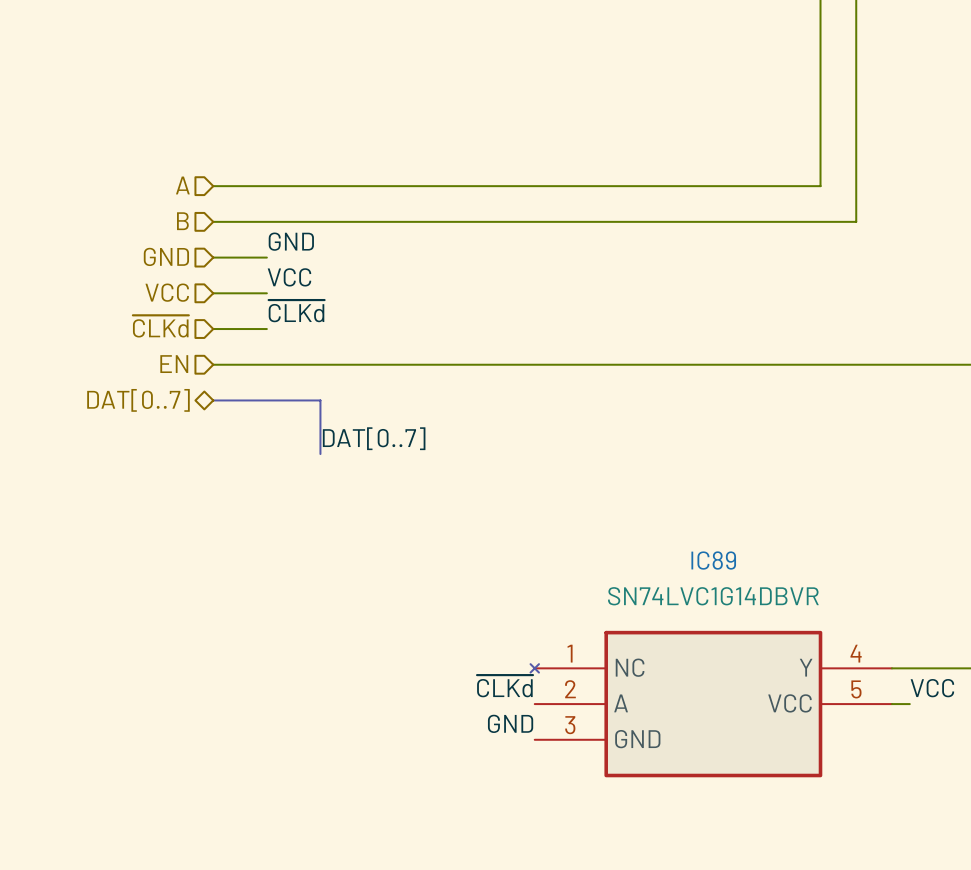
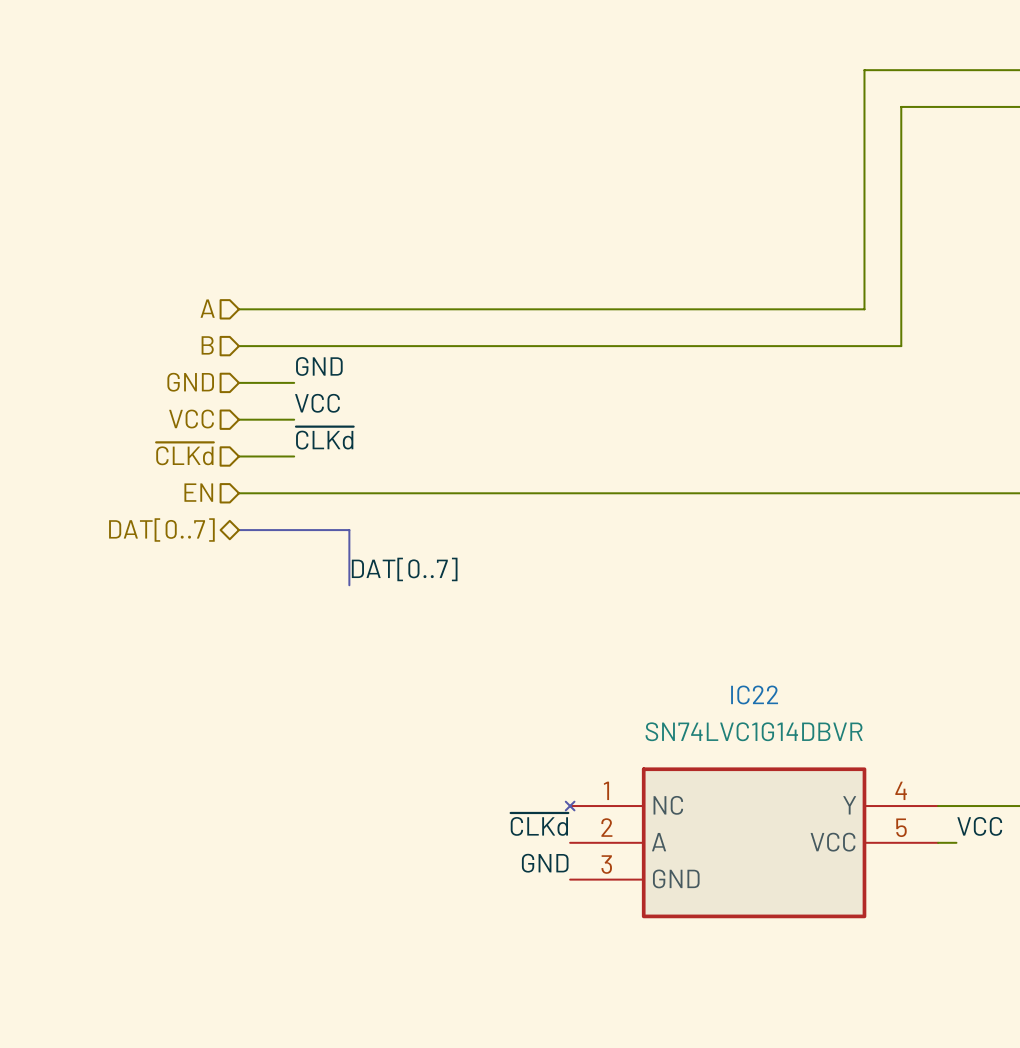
IC89 name: IC89 (713, 560) -> IC22 (754, 694)

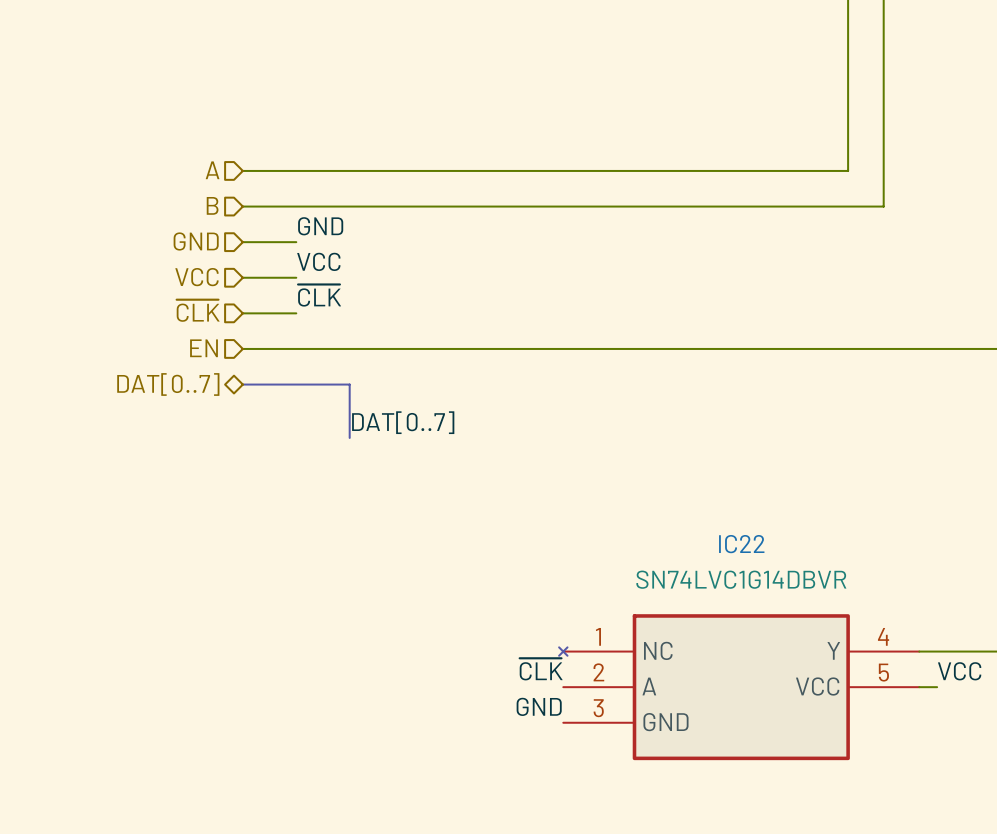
label: ~{CLKd} (324, 438) -> ~{CLK} (319, 295)
hierarchical label: ~{CLKd} (184, 453) -> ~{CLK} (198, 310)
label: ~{CLKd} (539, 824) -> ~{CLK} (541, 669)

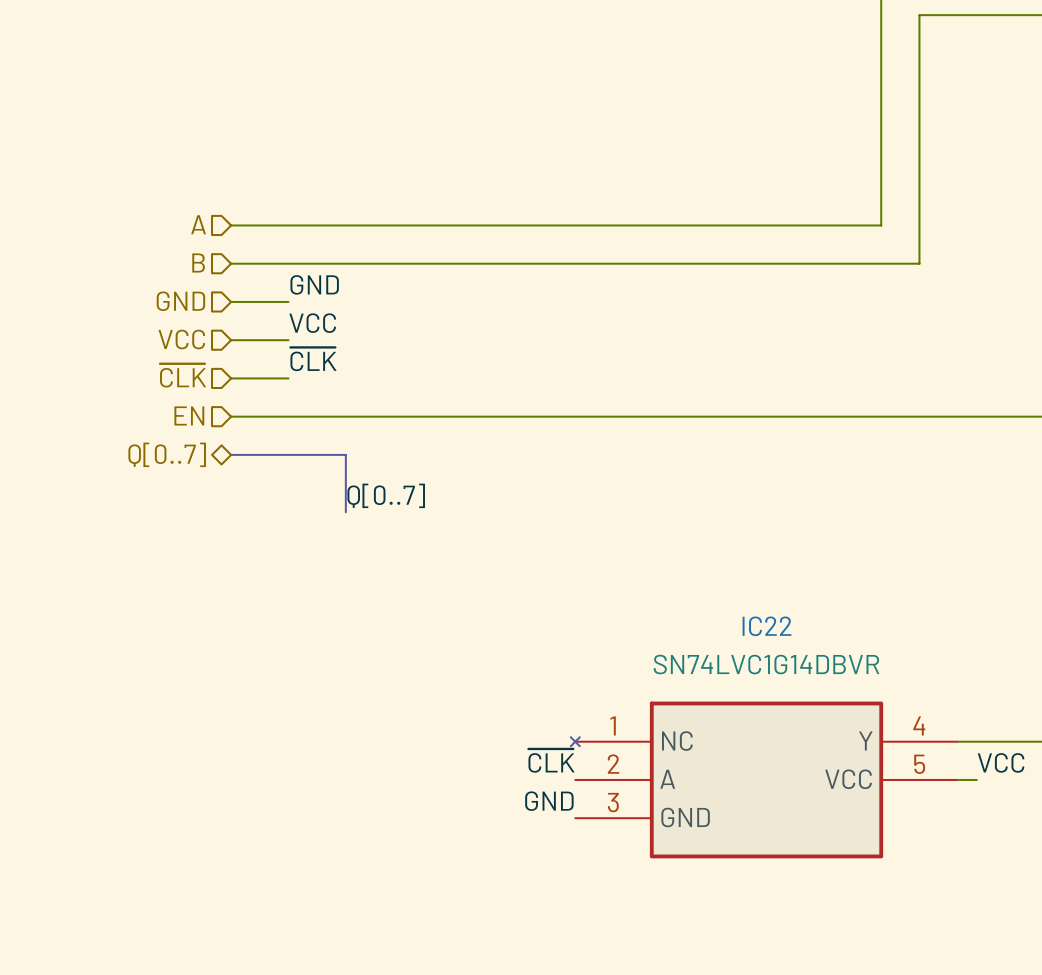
hierarchical label: DAT[0..7] (168, 384) -> Q[0..7] (167, 454)
label: DAT[0..7] (403, 422) -> Q[0..7] (386, 495)

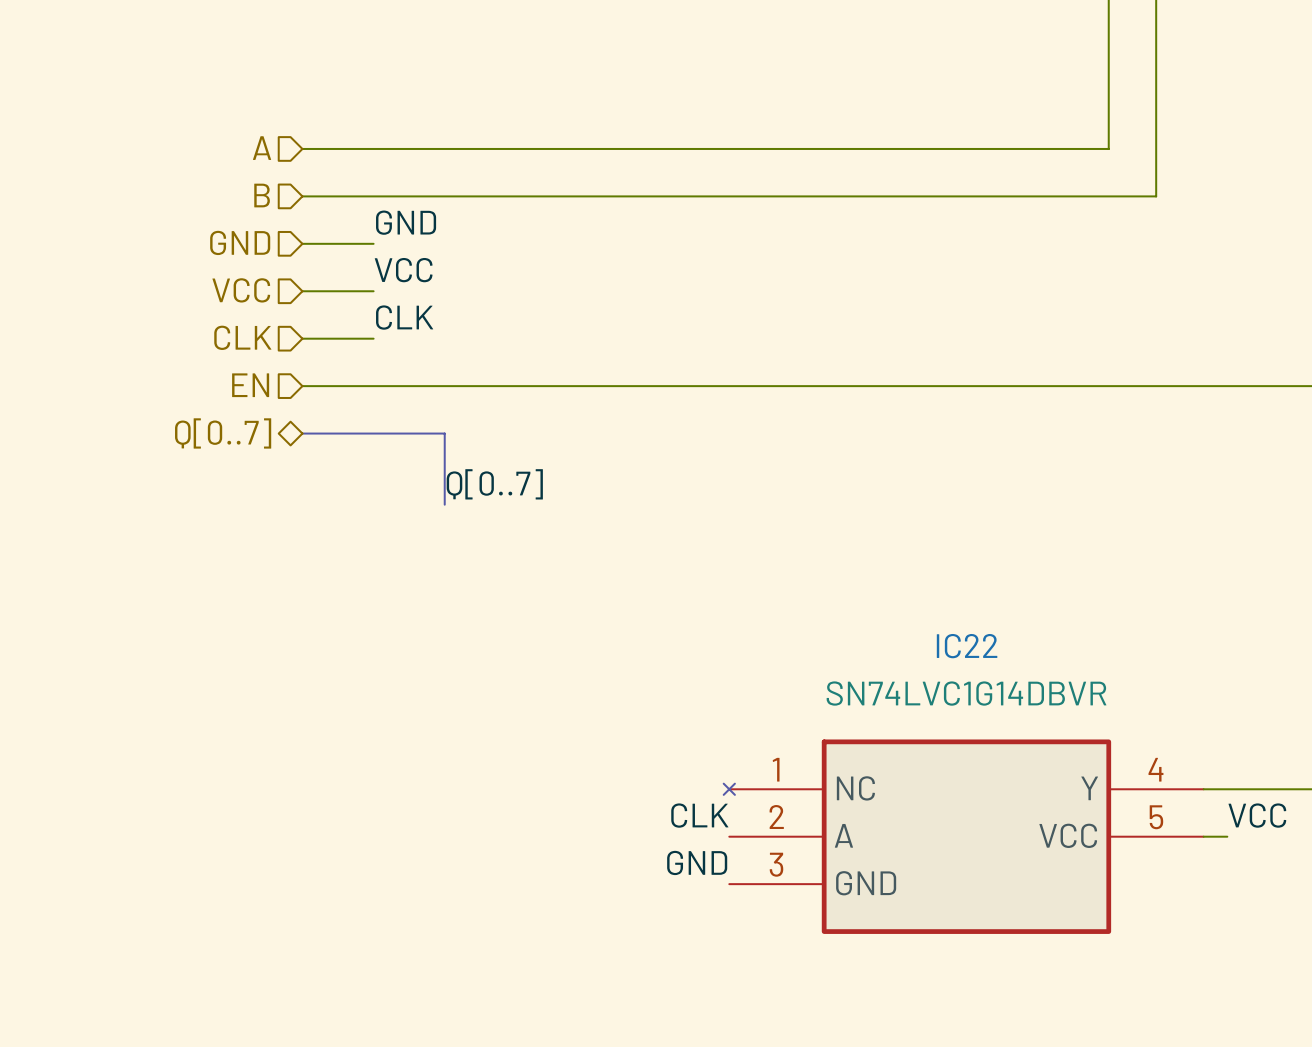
label: ~{CLK} (313, 359) -> CLK (404, 317)
hierarchical label: ~{CLK} (183, 375) -> CLK (242, 337)
label: ~{CLK} (551, 760) -> CLK (699, 815)

